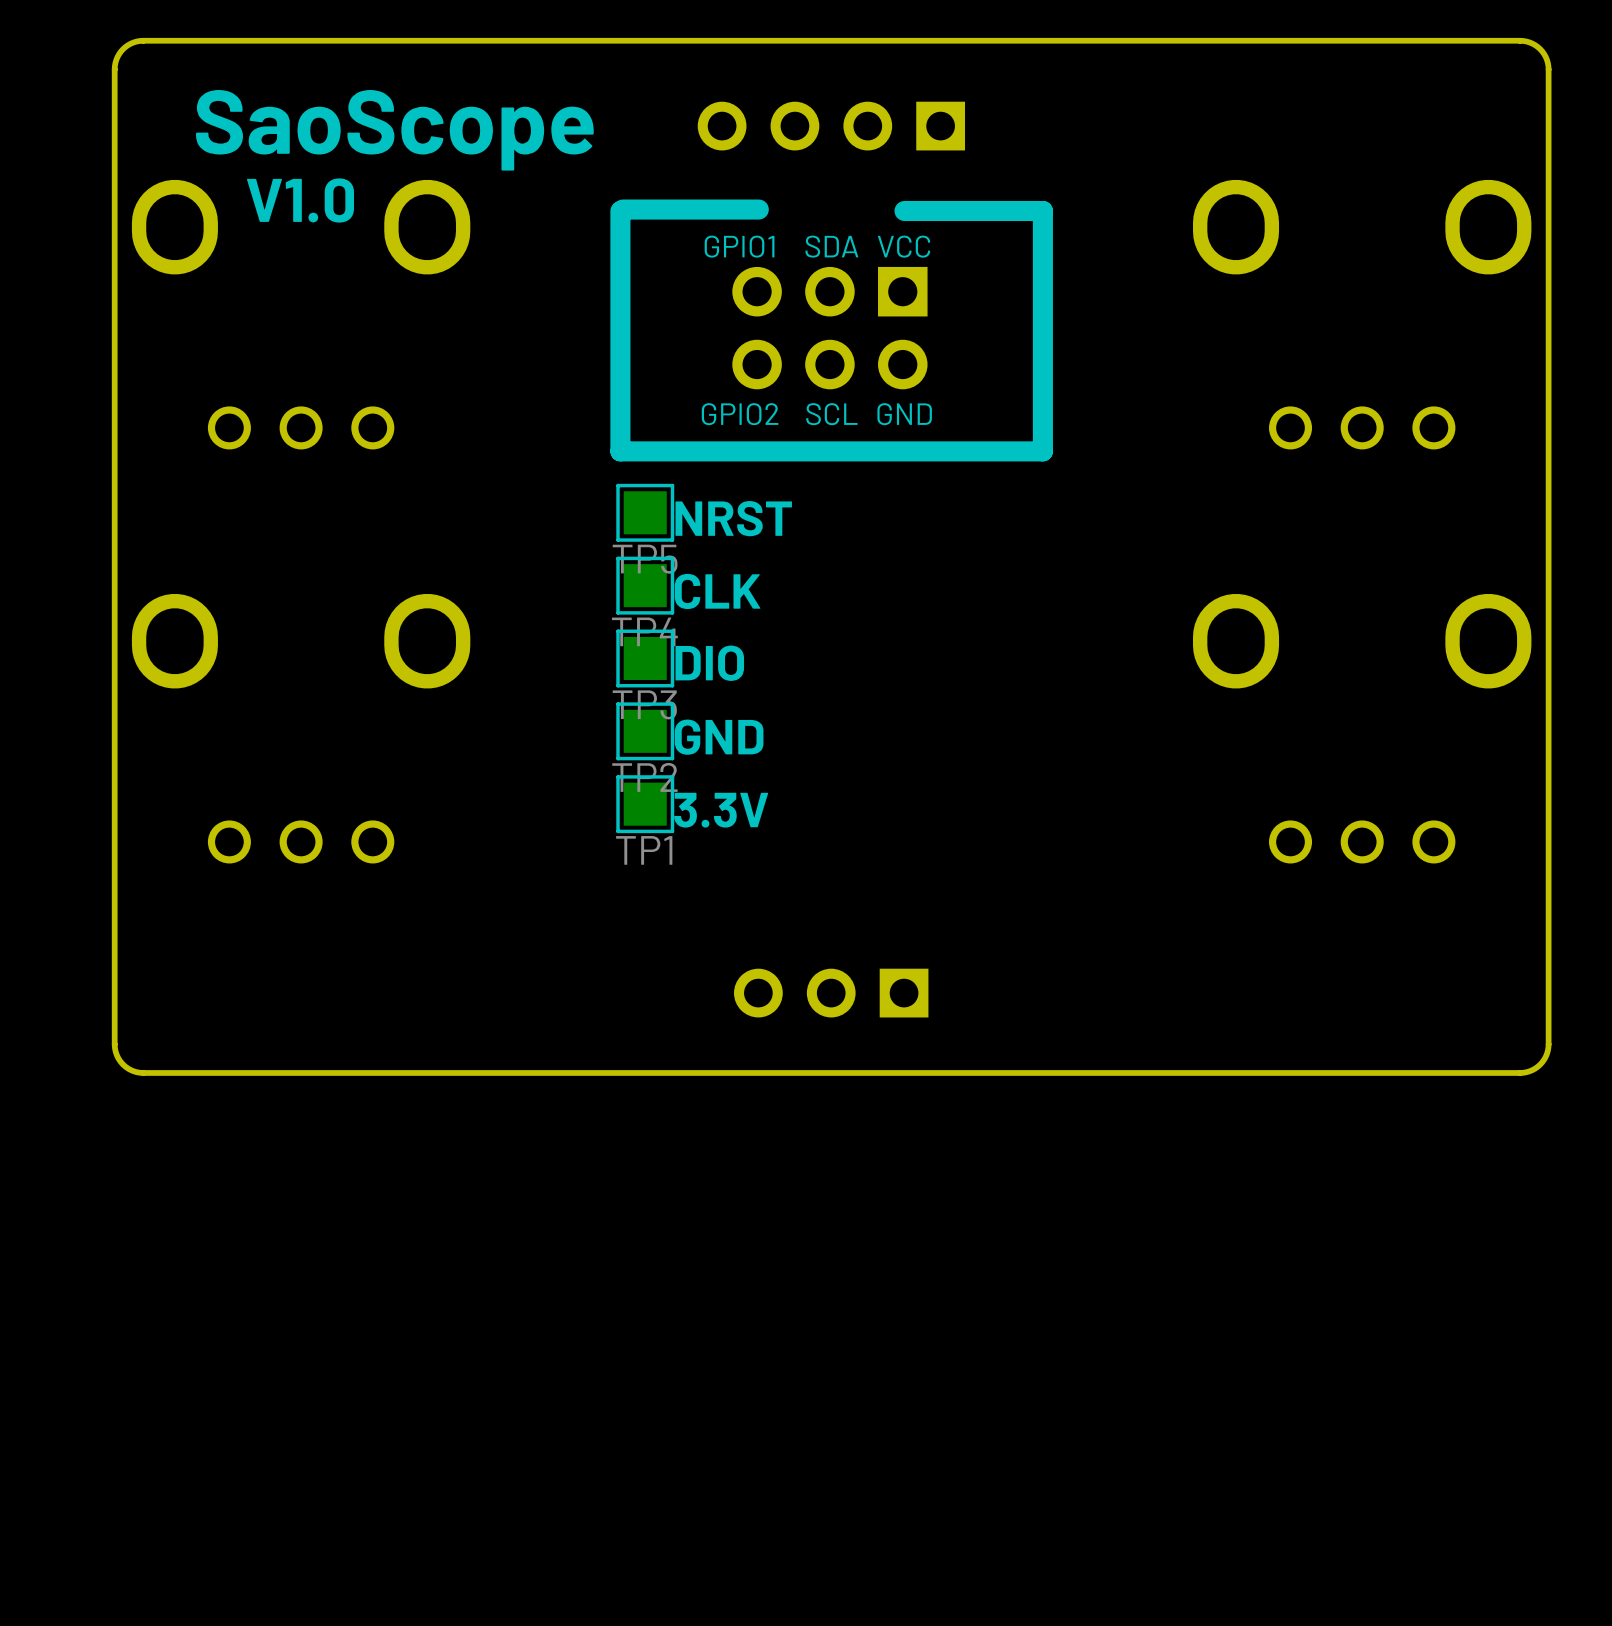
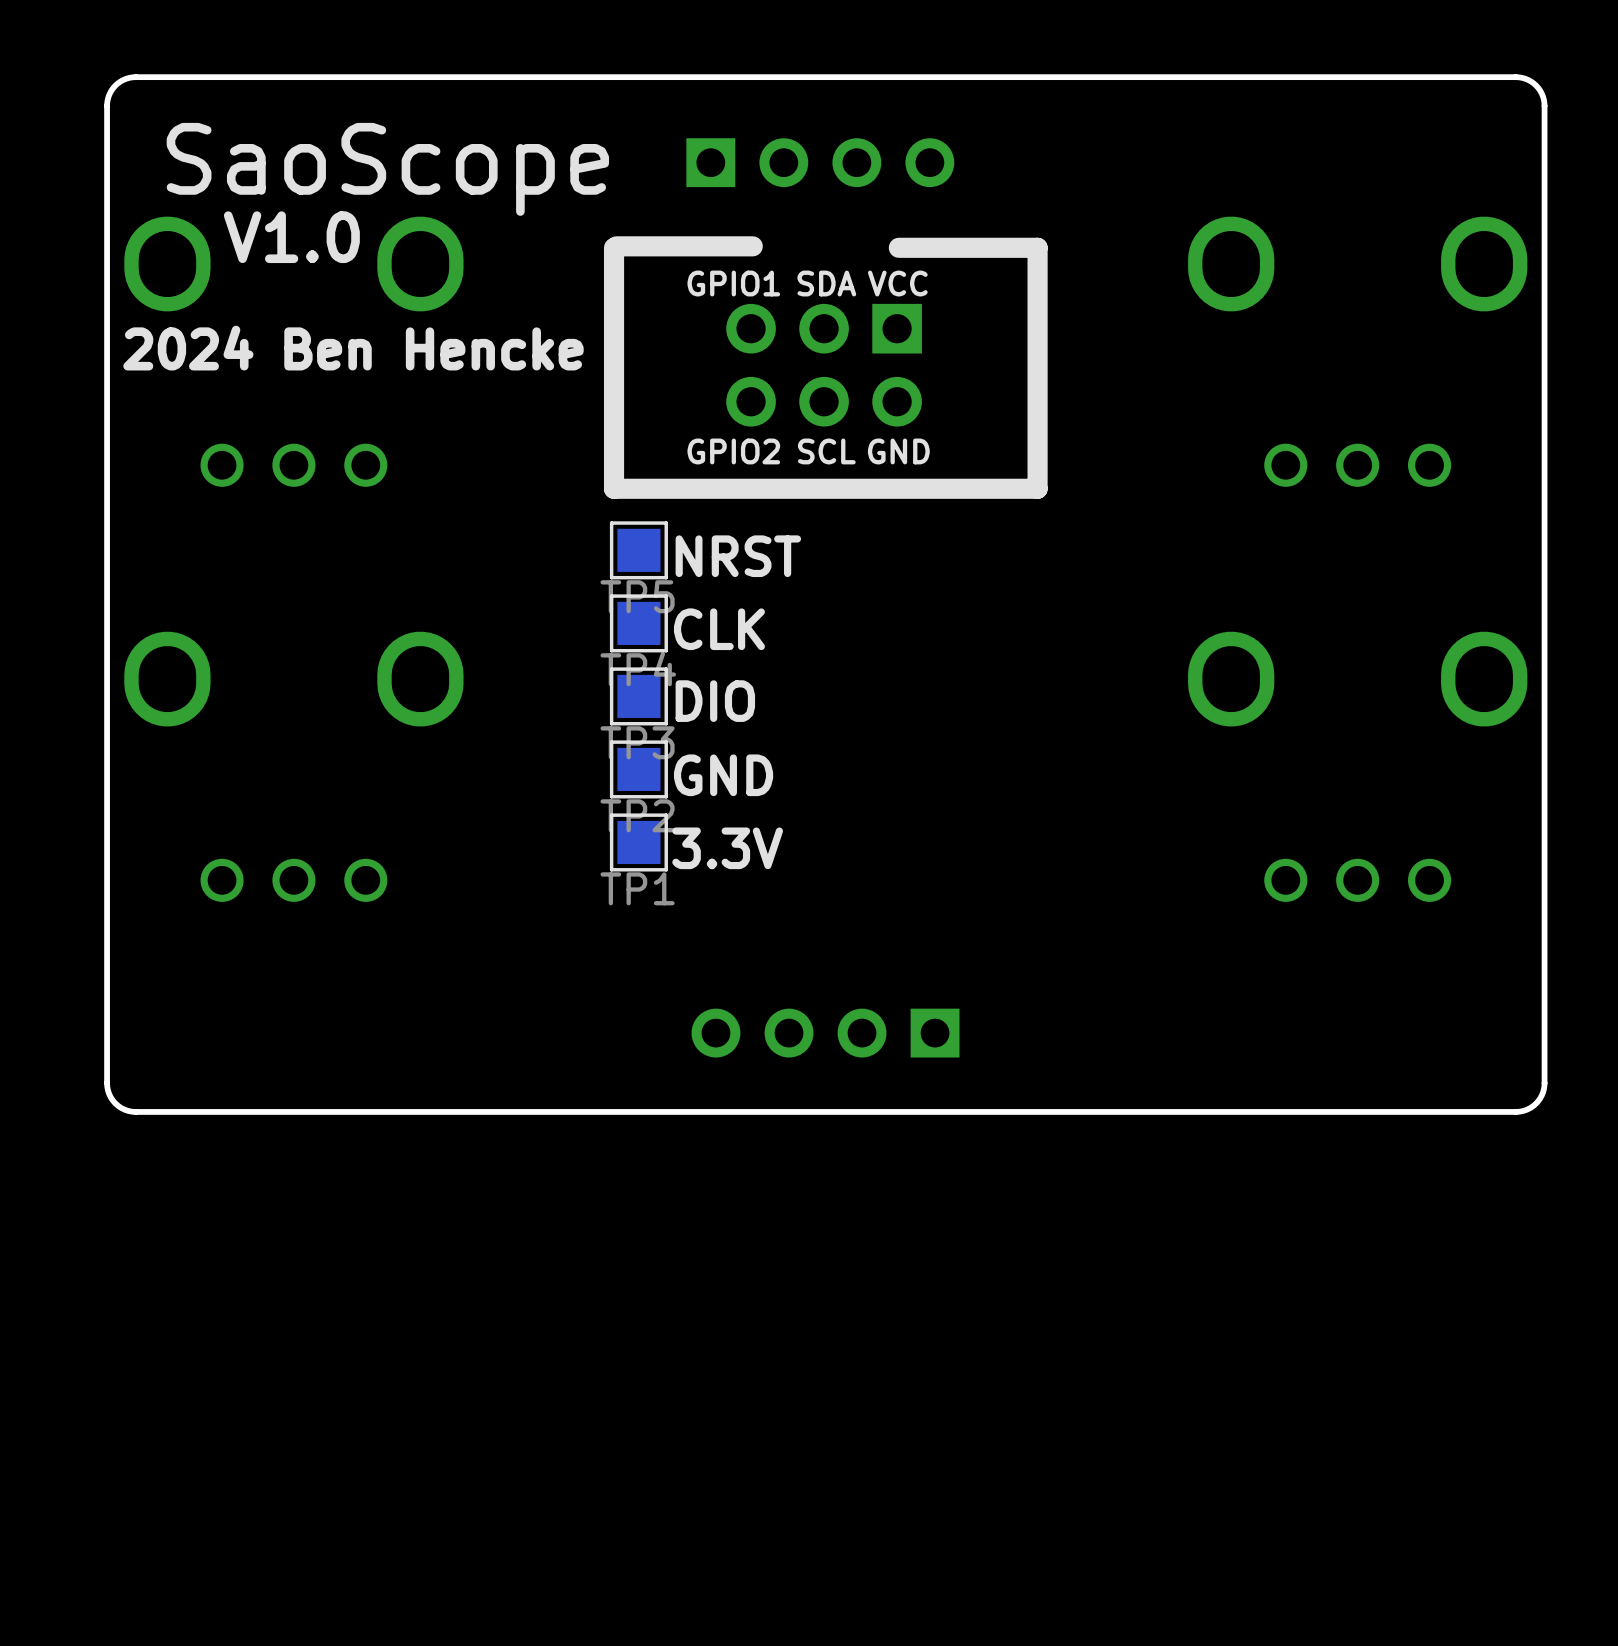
part rotation: 0° (831, 126) -> 180° (820, 162)
text: none -> 2024 Ben Hencke (353, 348)
part footprint: [734, 968, 929, 1018] -> [691, 1008, 960, 1058]

